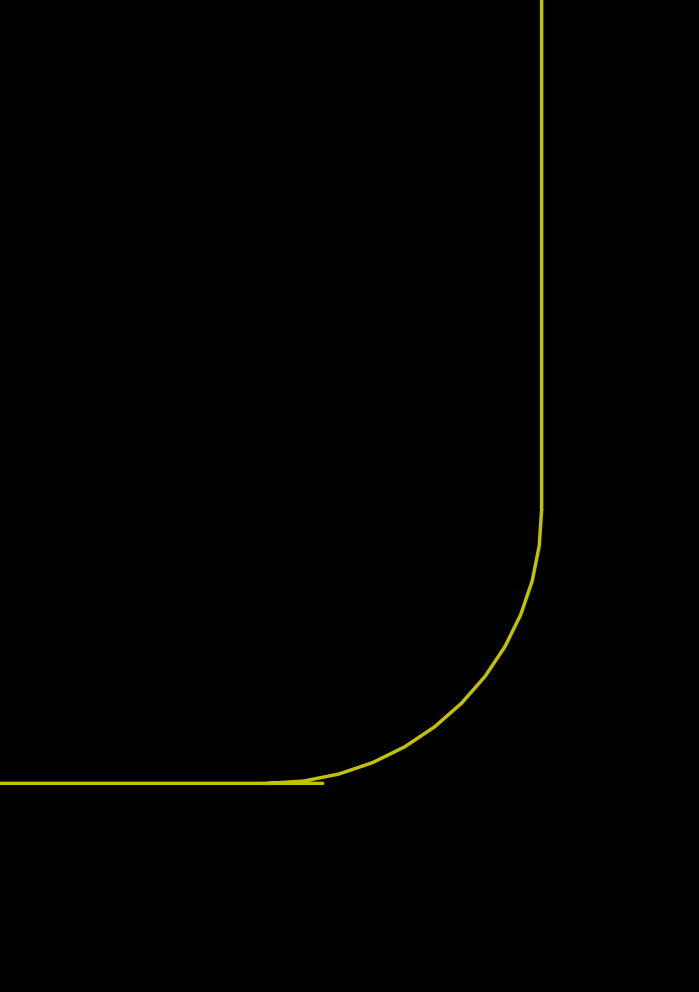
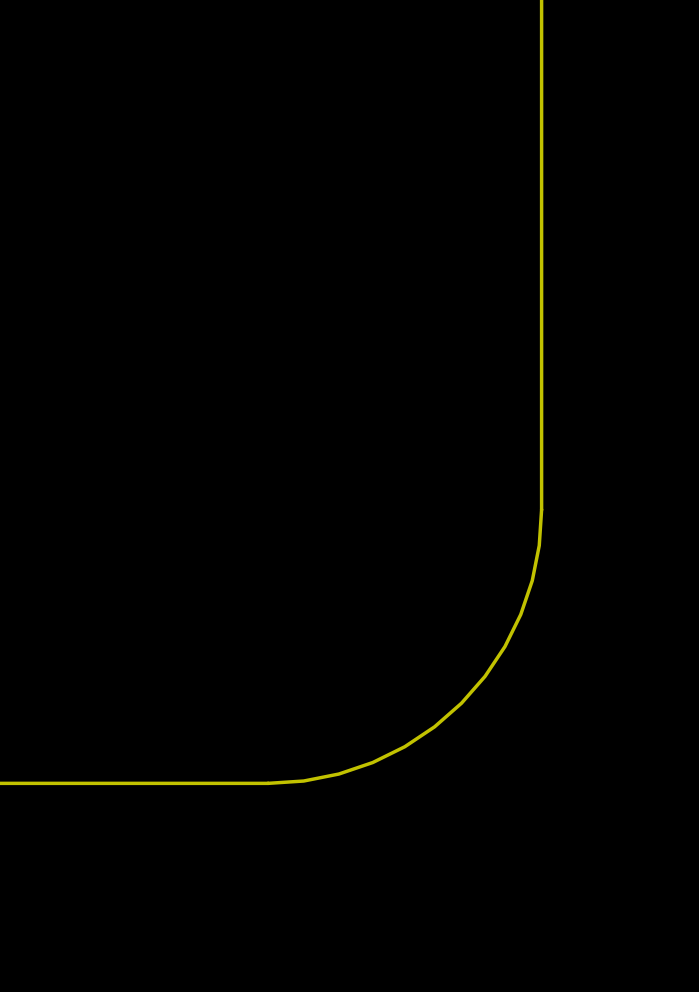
board edge: (268, 783) (322, 783) -> none

